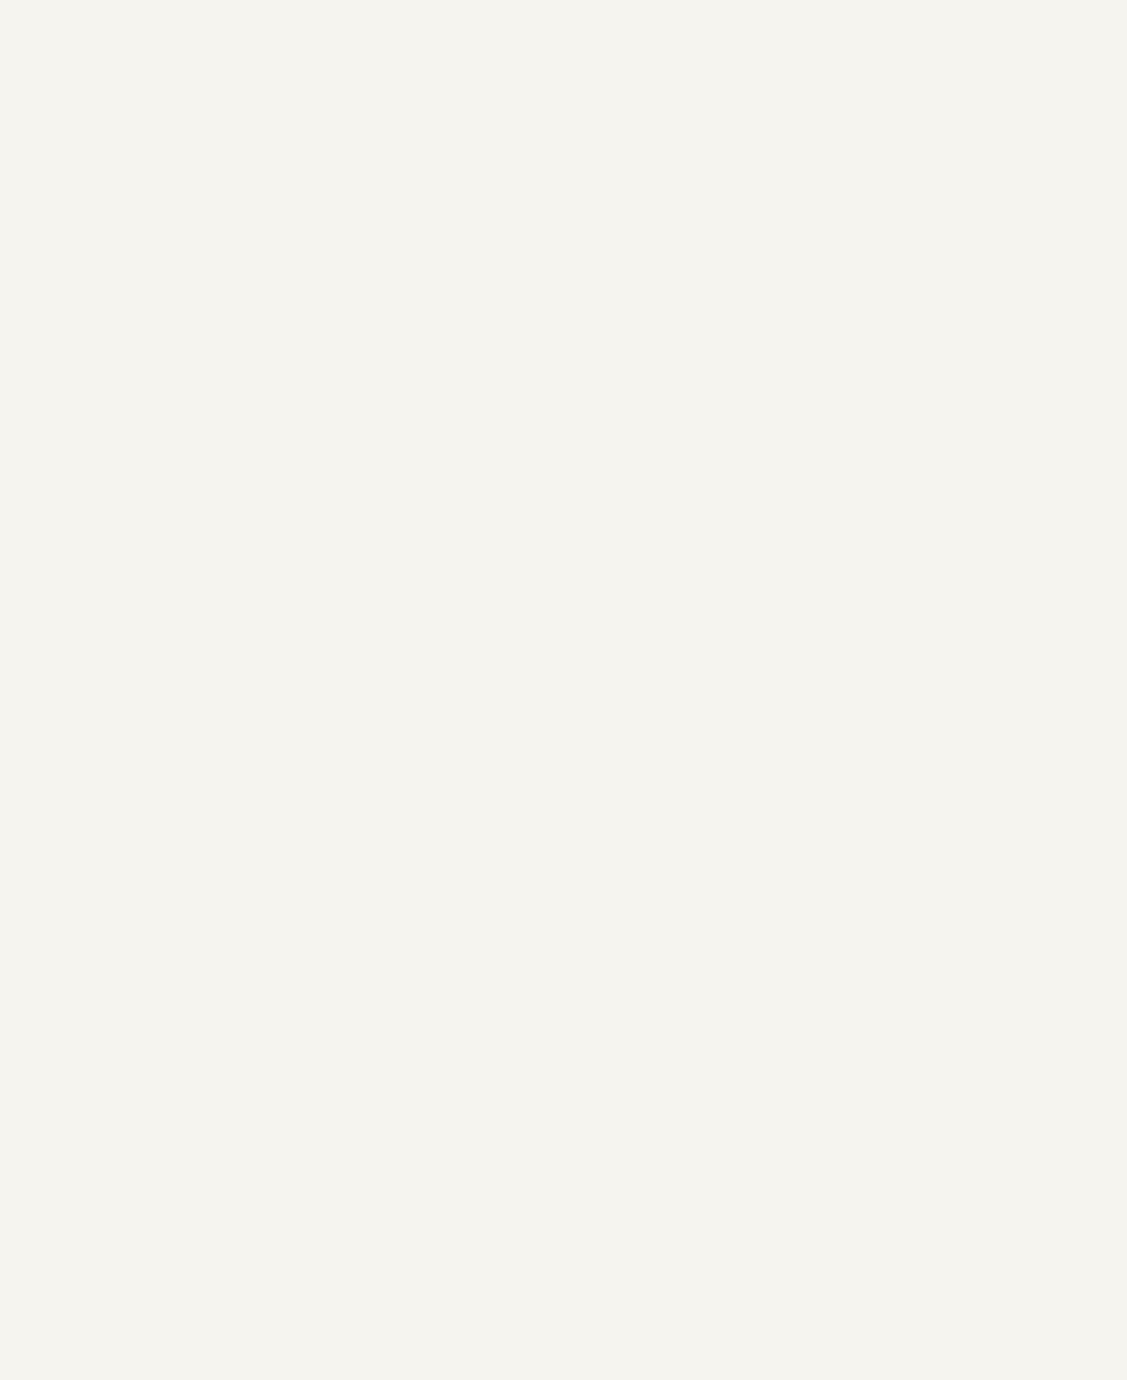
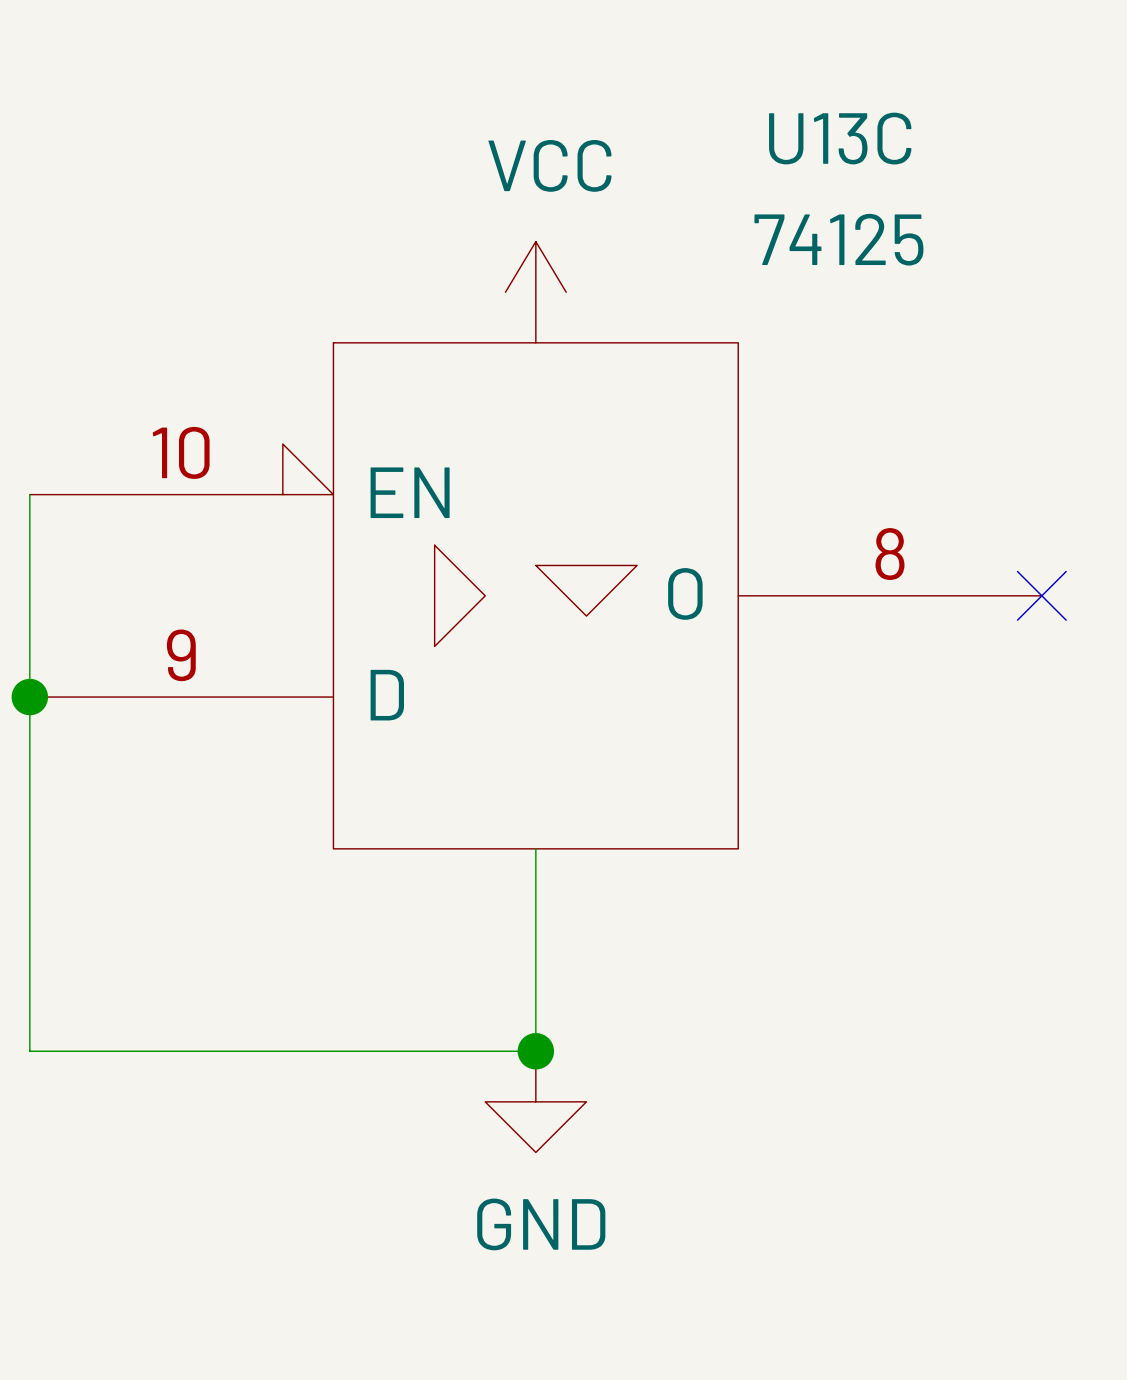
power symbol: none -> VCC (535, 292)
wire: none -> (29, 494) (29, 1051) (535, 1051) (535, 848)
U13C: none -> 74125 (535, 595)
no-connect mark: none -> (1041, 595)
junction: none -> (29, 697)
junction: none -> (535, 1051)
power symbol: none -> GND (535, 1101)

